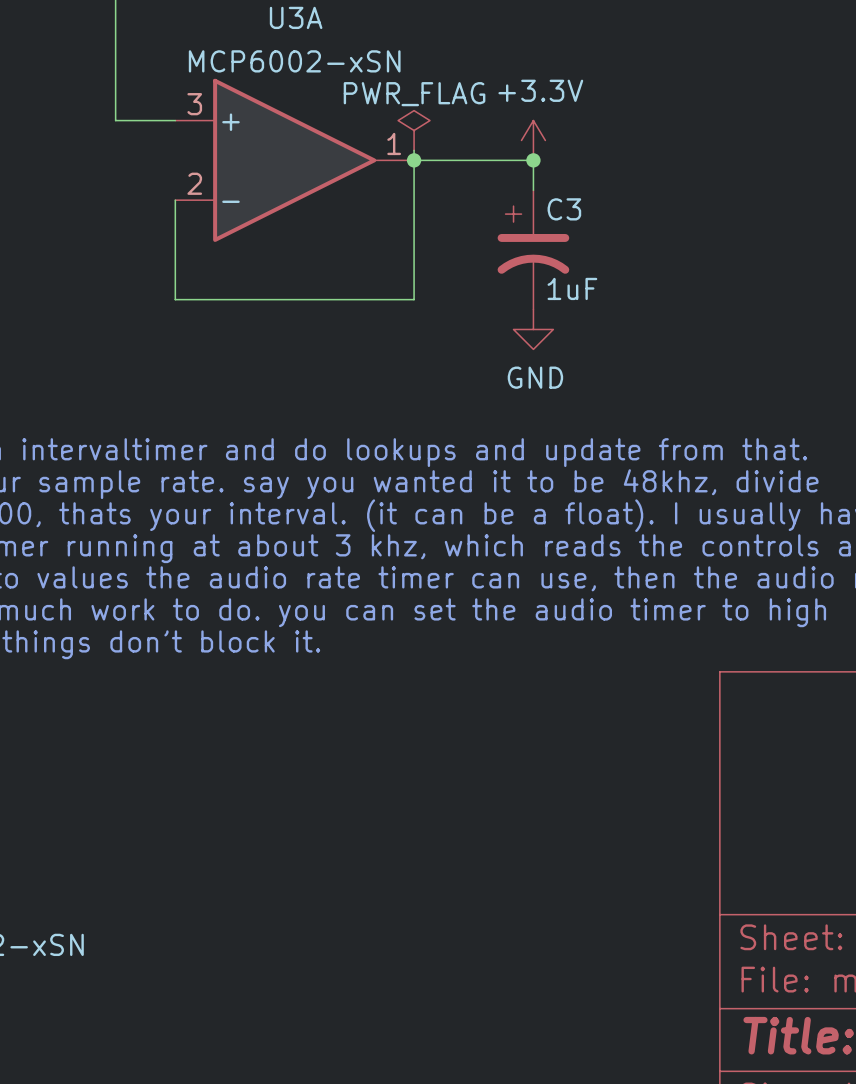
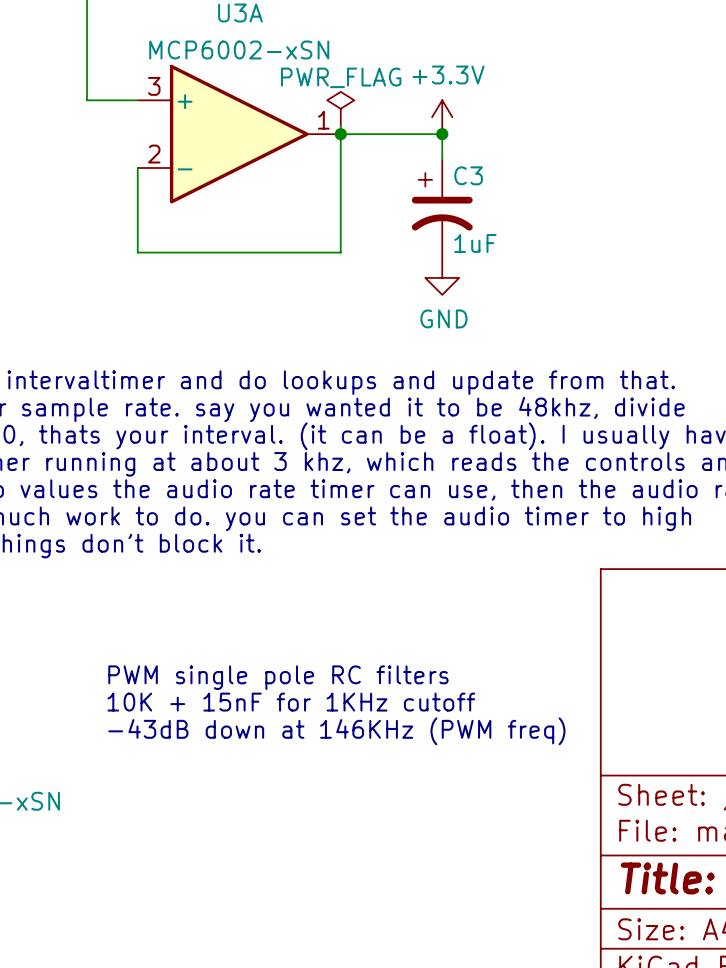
text: none -> PWM single pole RC filters (278, 677)
text: none -> 10K + 15nF for 1KHz cutoff (291, 702)
text: none -> -43dB down at 146KHz (PWM freq) (336, 731)

